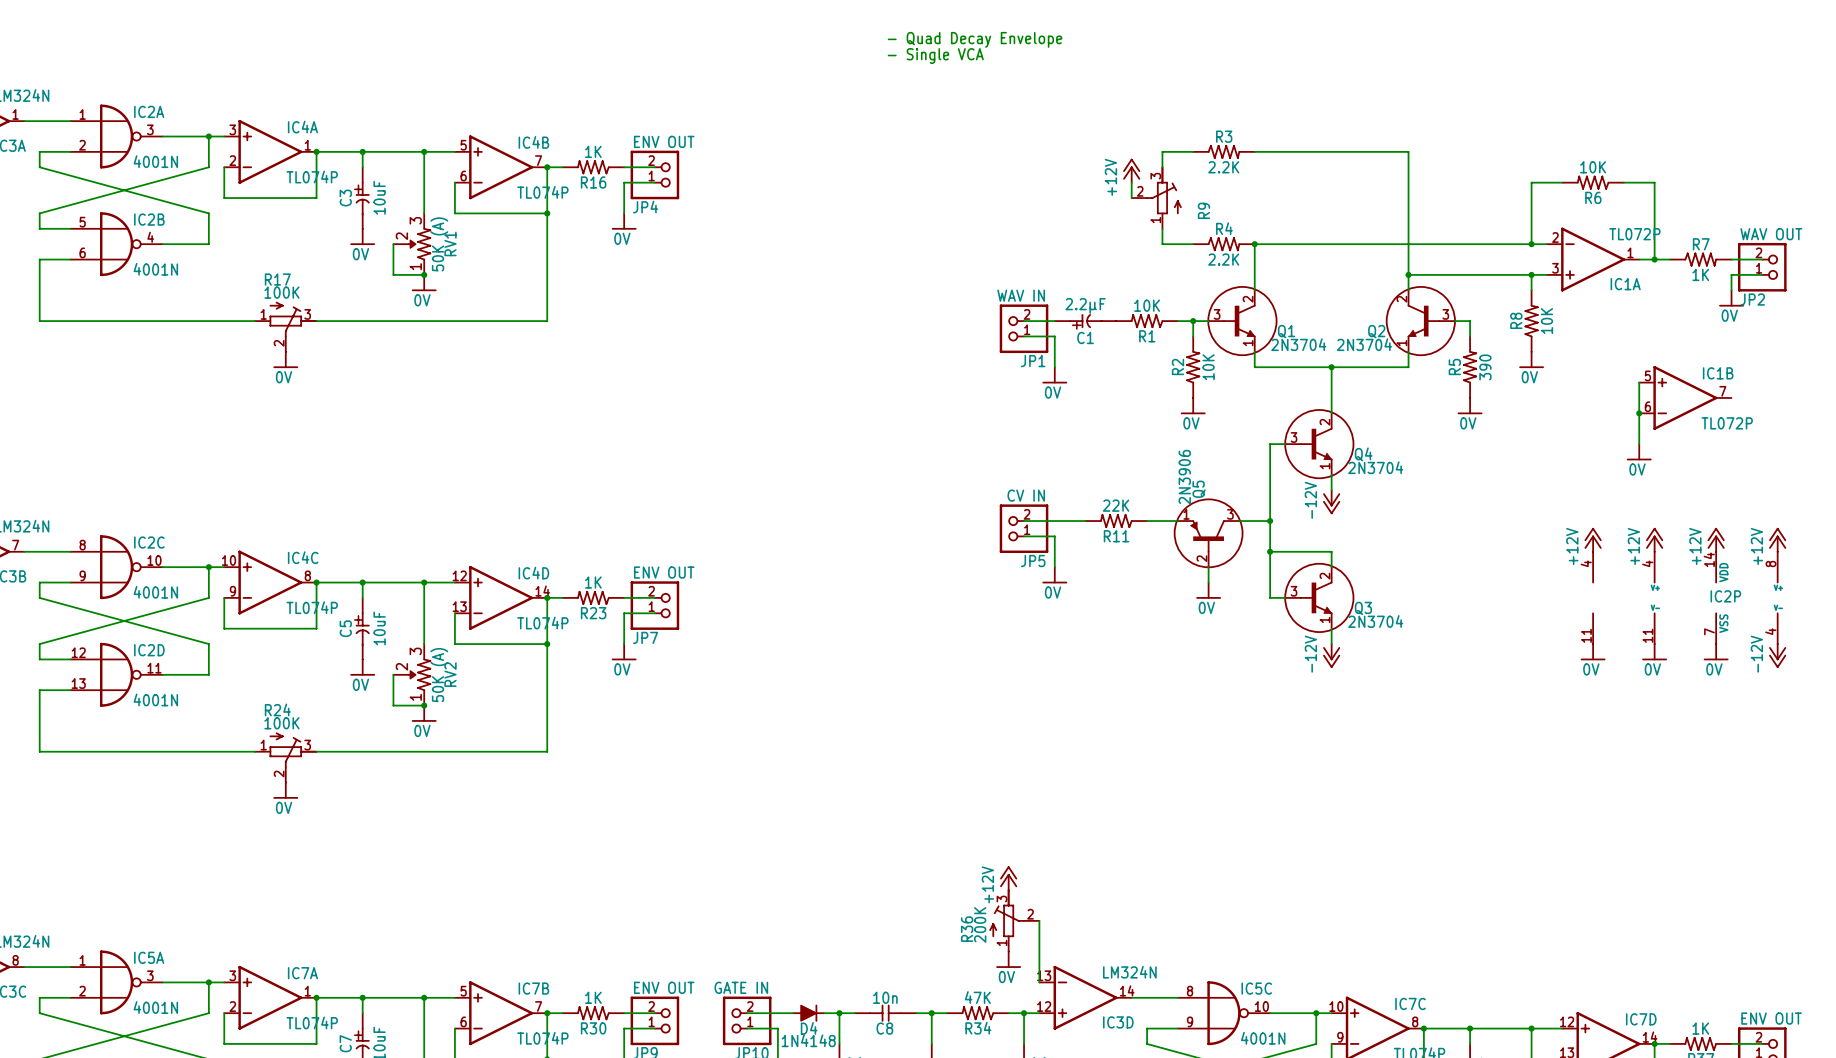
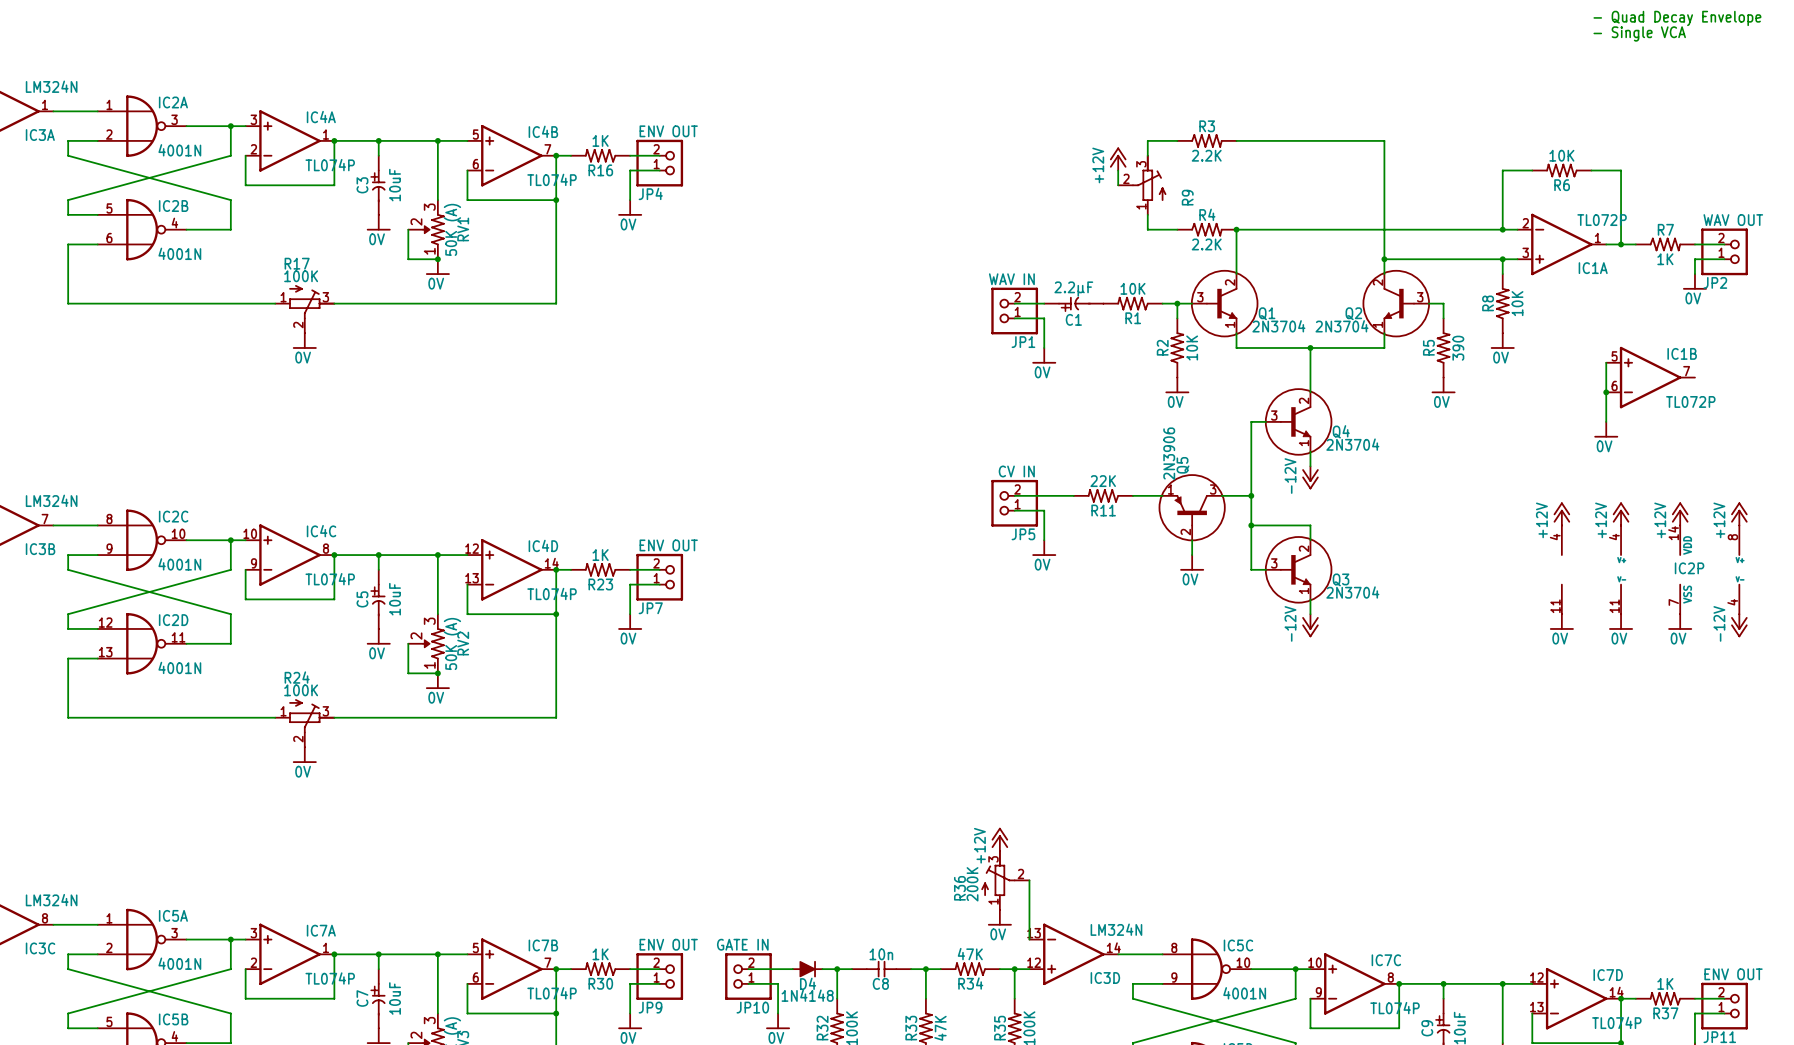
text: none -> - Quad Decay Envelope (1677, 18)
text: - Quad Decay Envelope (974, 39) -> none
text: none -> - Single VCA (1639, 33)
text: - Single VCA (935, 56) -> none

